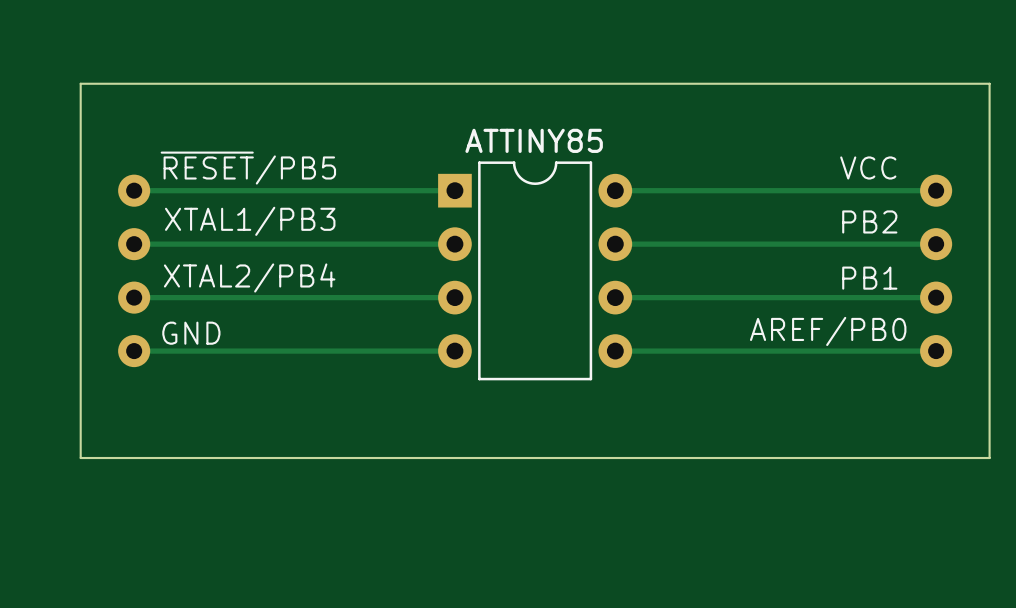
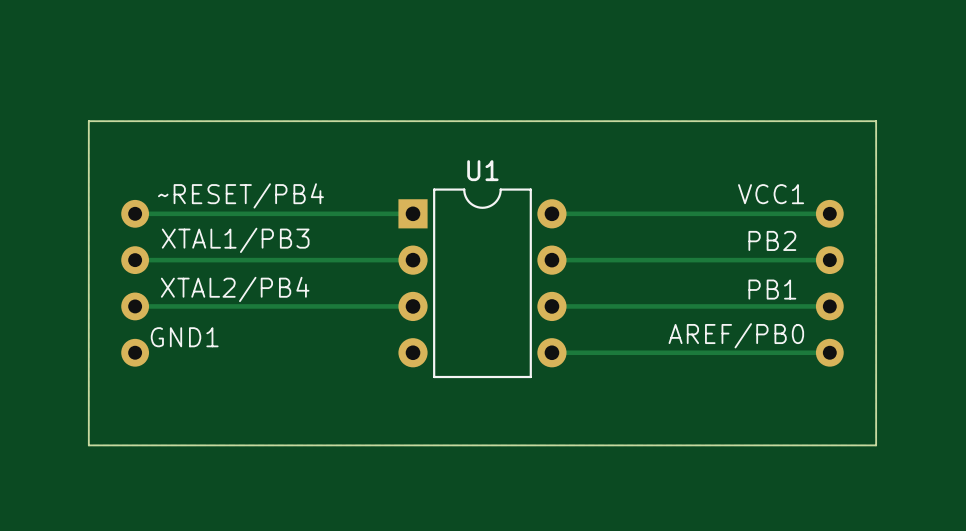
ATTINY85 name: ATTINY85 (534, 140) -> U1 (482, 170)
VCC name: VCC (868, 167) -> VCC1 (771, 194)
~{RESET}/PB5 name: ~{RESET}/PB5 (248, 168) -> ~RESET/PB4 (240, 195)
GND name: GND (191, 333) -> GND1 (184, 337)
track: (134, 351) (454, 351) -> none

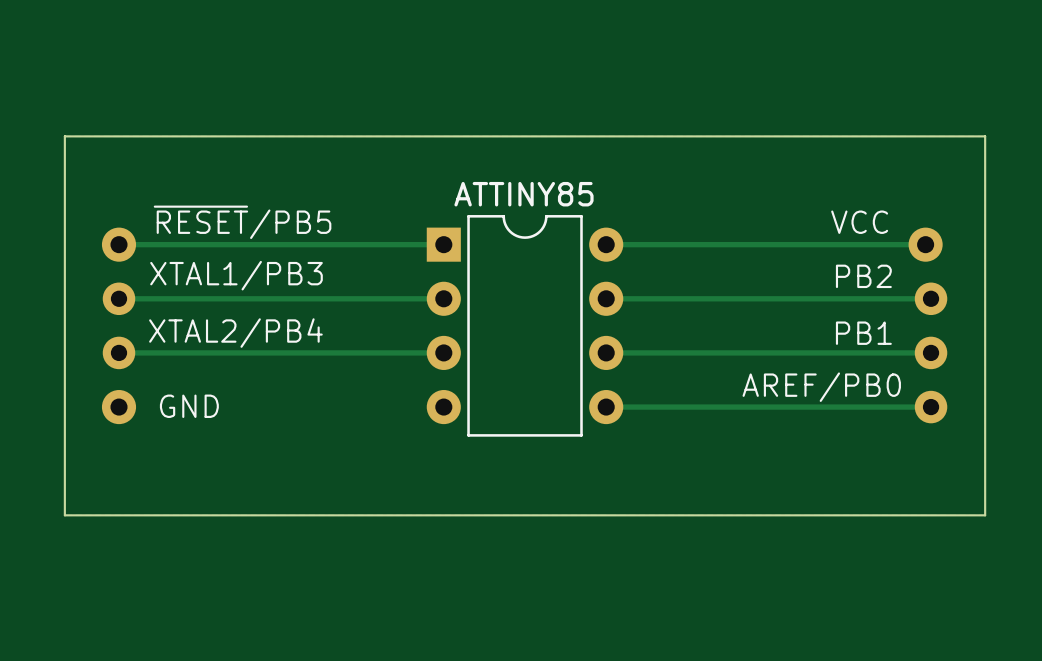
U1 name: U1 (482, 170) -> ATTINY85 (524, 194)
~RESET/PB4: (135, 213) -> none
~{RESET}/PB5: none -> (119, 244)
VCC: none -> (925, 244)
VCC1: (829, 213) -> none
GND1: (135, 352) -> none
GND: none -> (119, 407)

